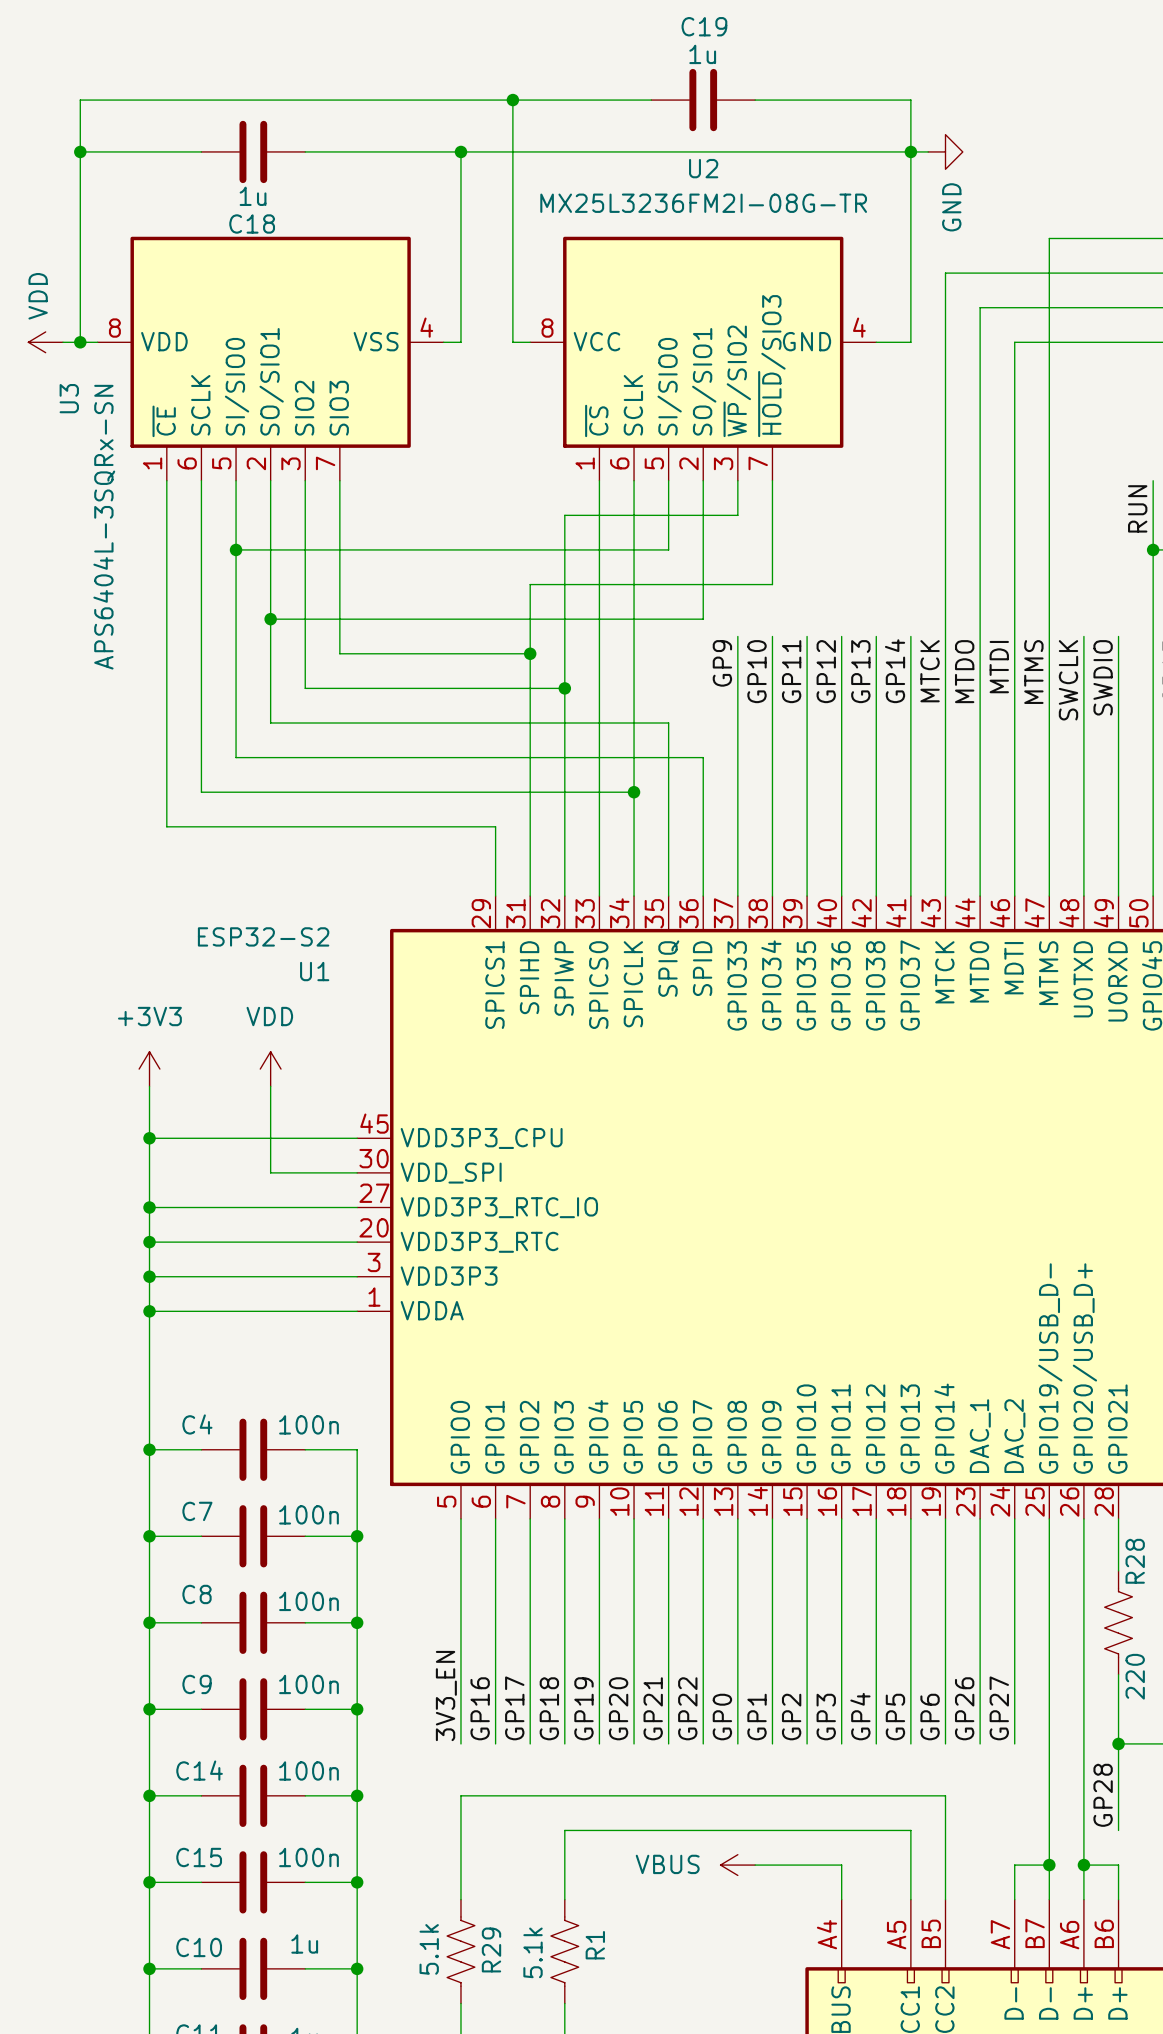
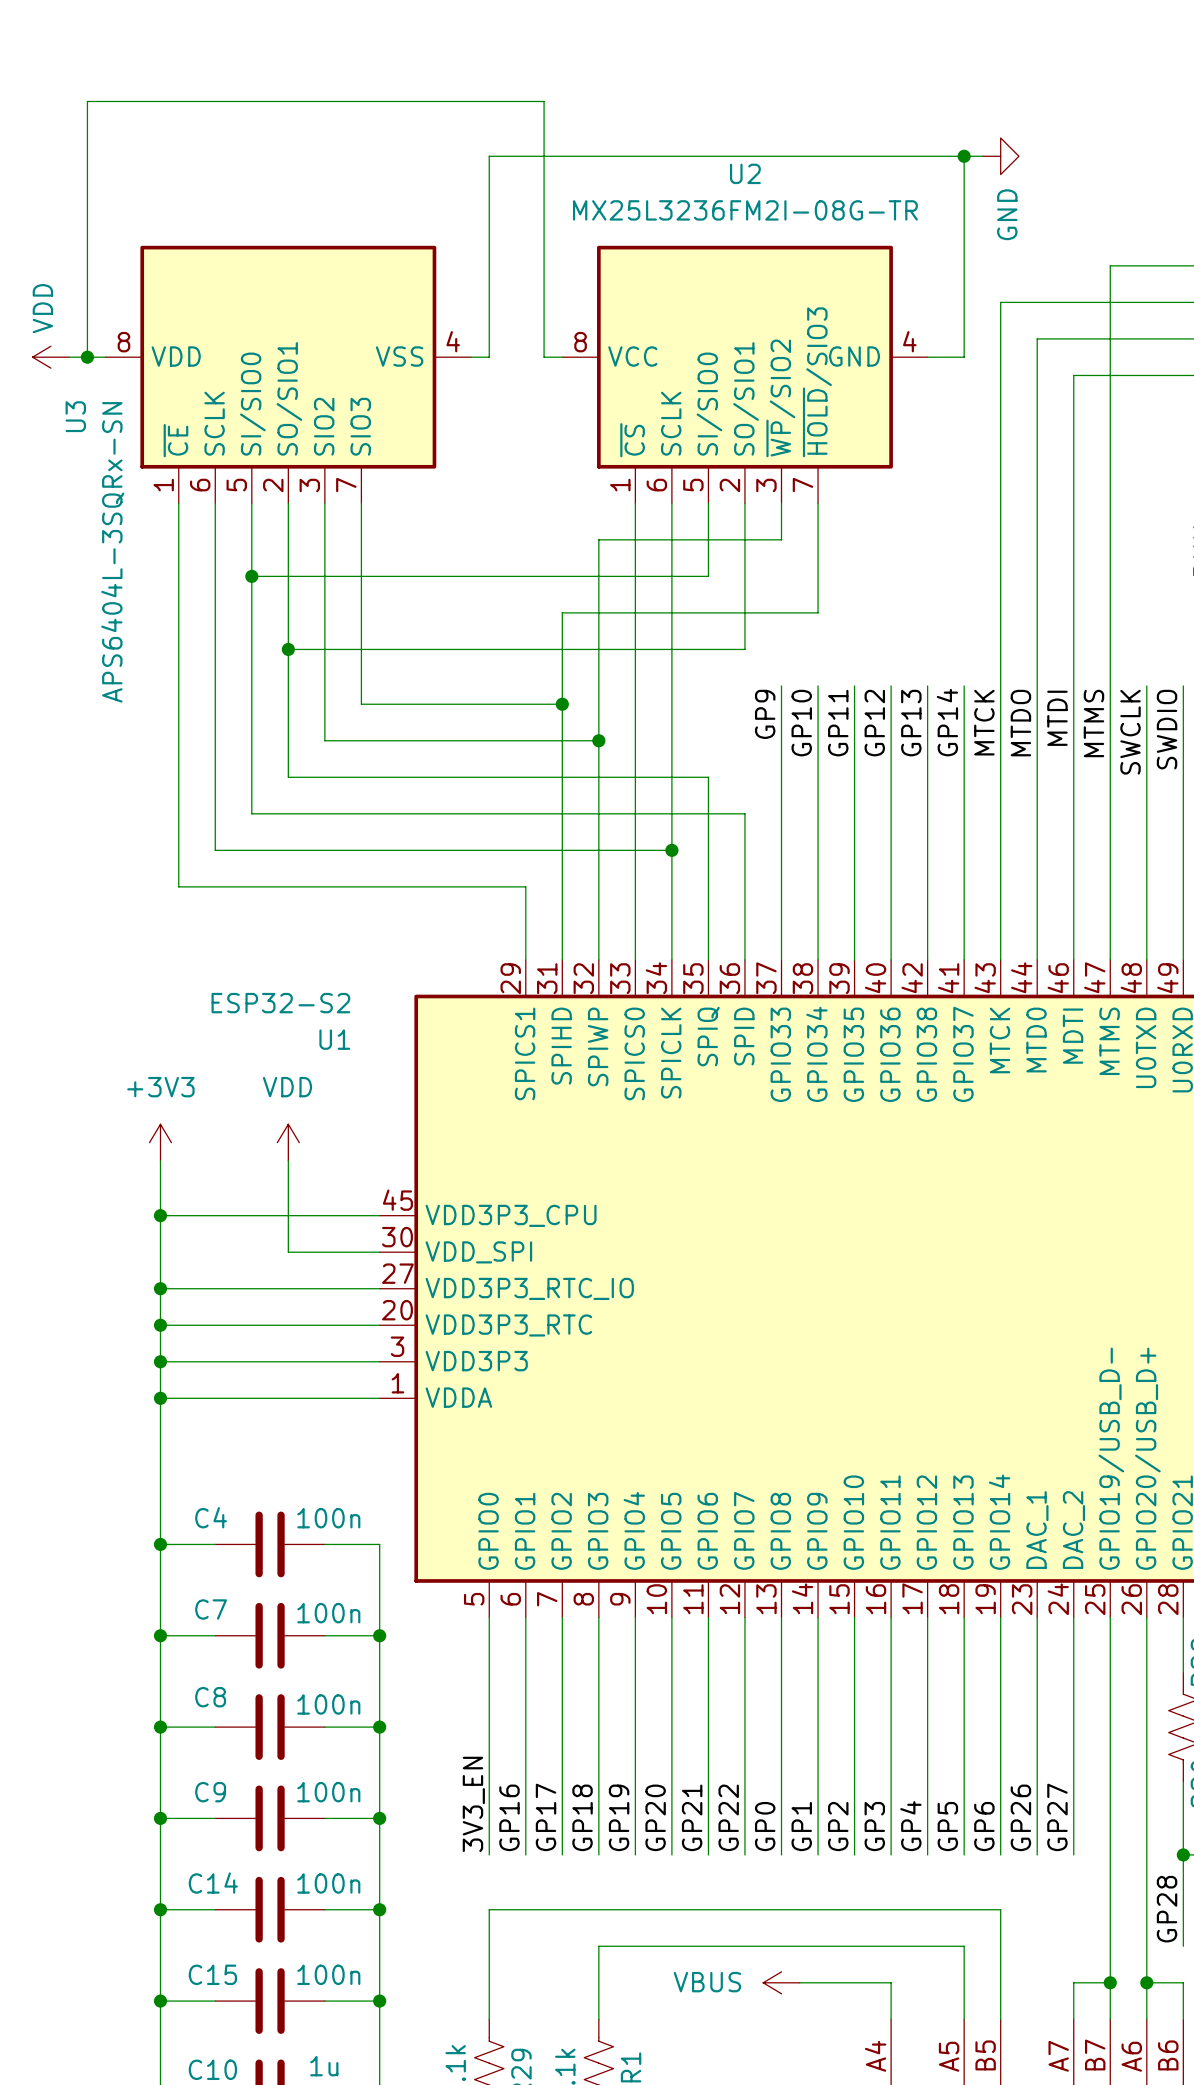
wire: (80, 100) (651, 100) -> (87, 119) (87, 101) (544, 101) (544, 119)
junction: (512, 100) -> none
C19: 1u (703, 100) -> none
wire: (755, 100) (910, 100) (910, 134) -> none
wire: none -> (982, 156) (489, 156) (489, 174)
wire: (80, 151) (201, 151) -> none
junction: (80, 151) -> none
C18: 1u (253, 151) -> none
wire: (305, 151) (928, 151) -> none
junction: (460, 151) -> none
junction position: (910, 151) -> (964, 156)
power symbol position: GND (945, 151) -> GND (1000, 156)
wire: (460, 325) (460, 342) (443, 342) -> (489, 357) (470, 357)
wire: (512, 325) (512, 342) (530, 342) -> (544, 357) (562, 357)
wire: (910, 325) (910, 342) (876, 342) -> (964, 357) (927, 357)
power symbol position: VDD (45, 342) -> VDD (50, 357)
wire: (62, 342) (97, 342) -> (69, 357) (105, 357)
junction position: (80, 342) -> (87, 357)
U3 position: (270, 358) -> (288, 374)
U2 position: (703, 358) -> (744, 374)
wire: (737, 498) (737, 515) (564, 515) -> (781, 539) (598, 539) (598, 558)
wire: (668, 532) (668, 549) (236, 549) -> (708, 576) (251, 576)
junction position: (236, 549) -> (251, 576)
wire: (772, 567) (772, 584) (530, 584) -> (818, 612) (562, 612) (562, 631)
wire: (703, 601) (703, 619) (270, 619) -> (744, 649) (288, 649)
junction position: (270, 619) -> (288, 649)

